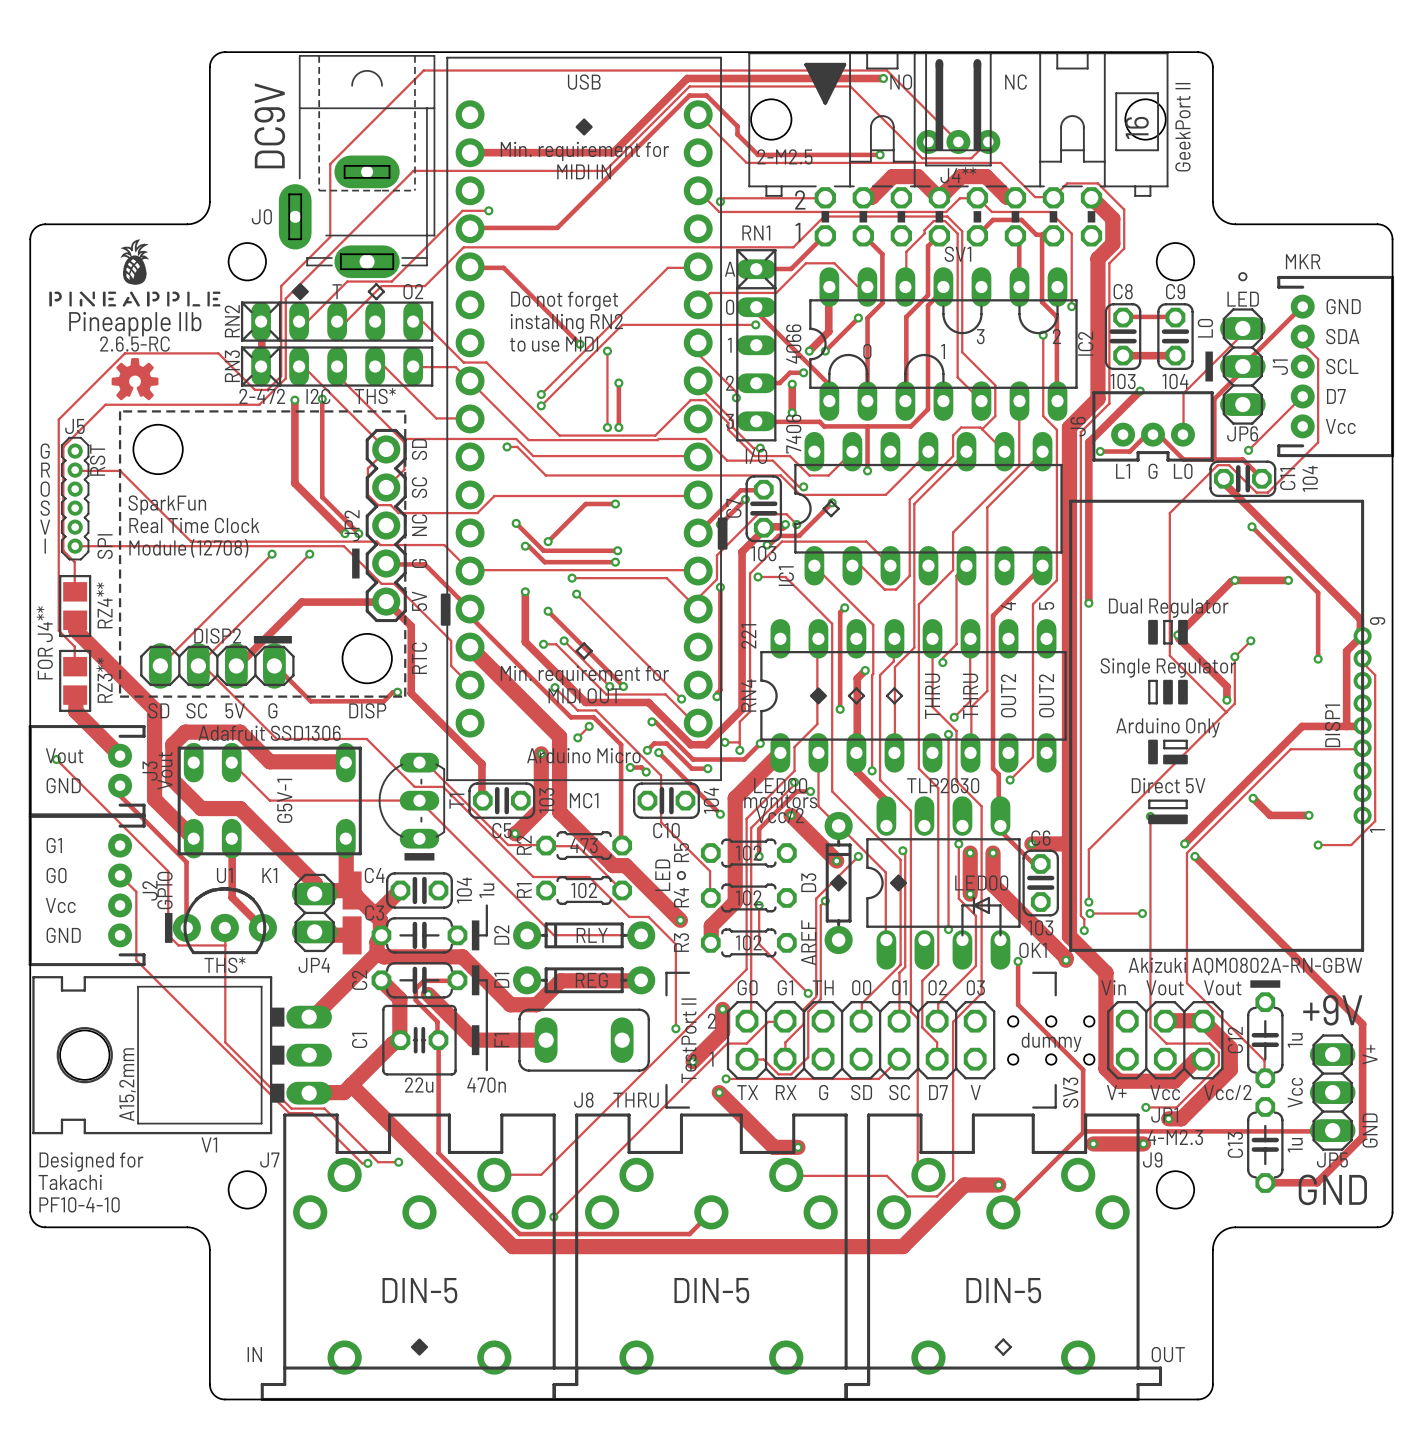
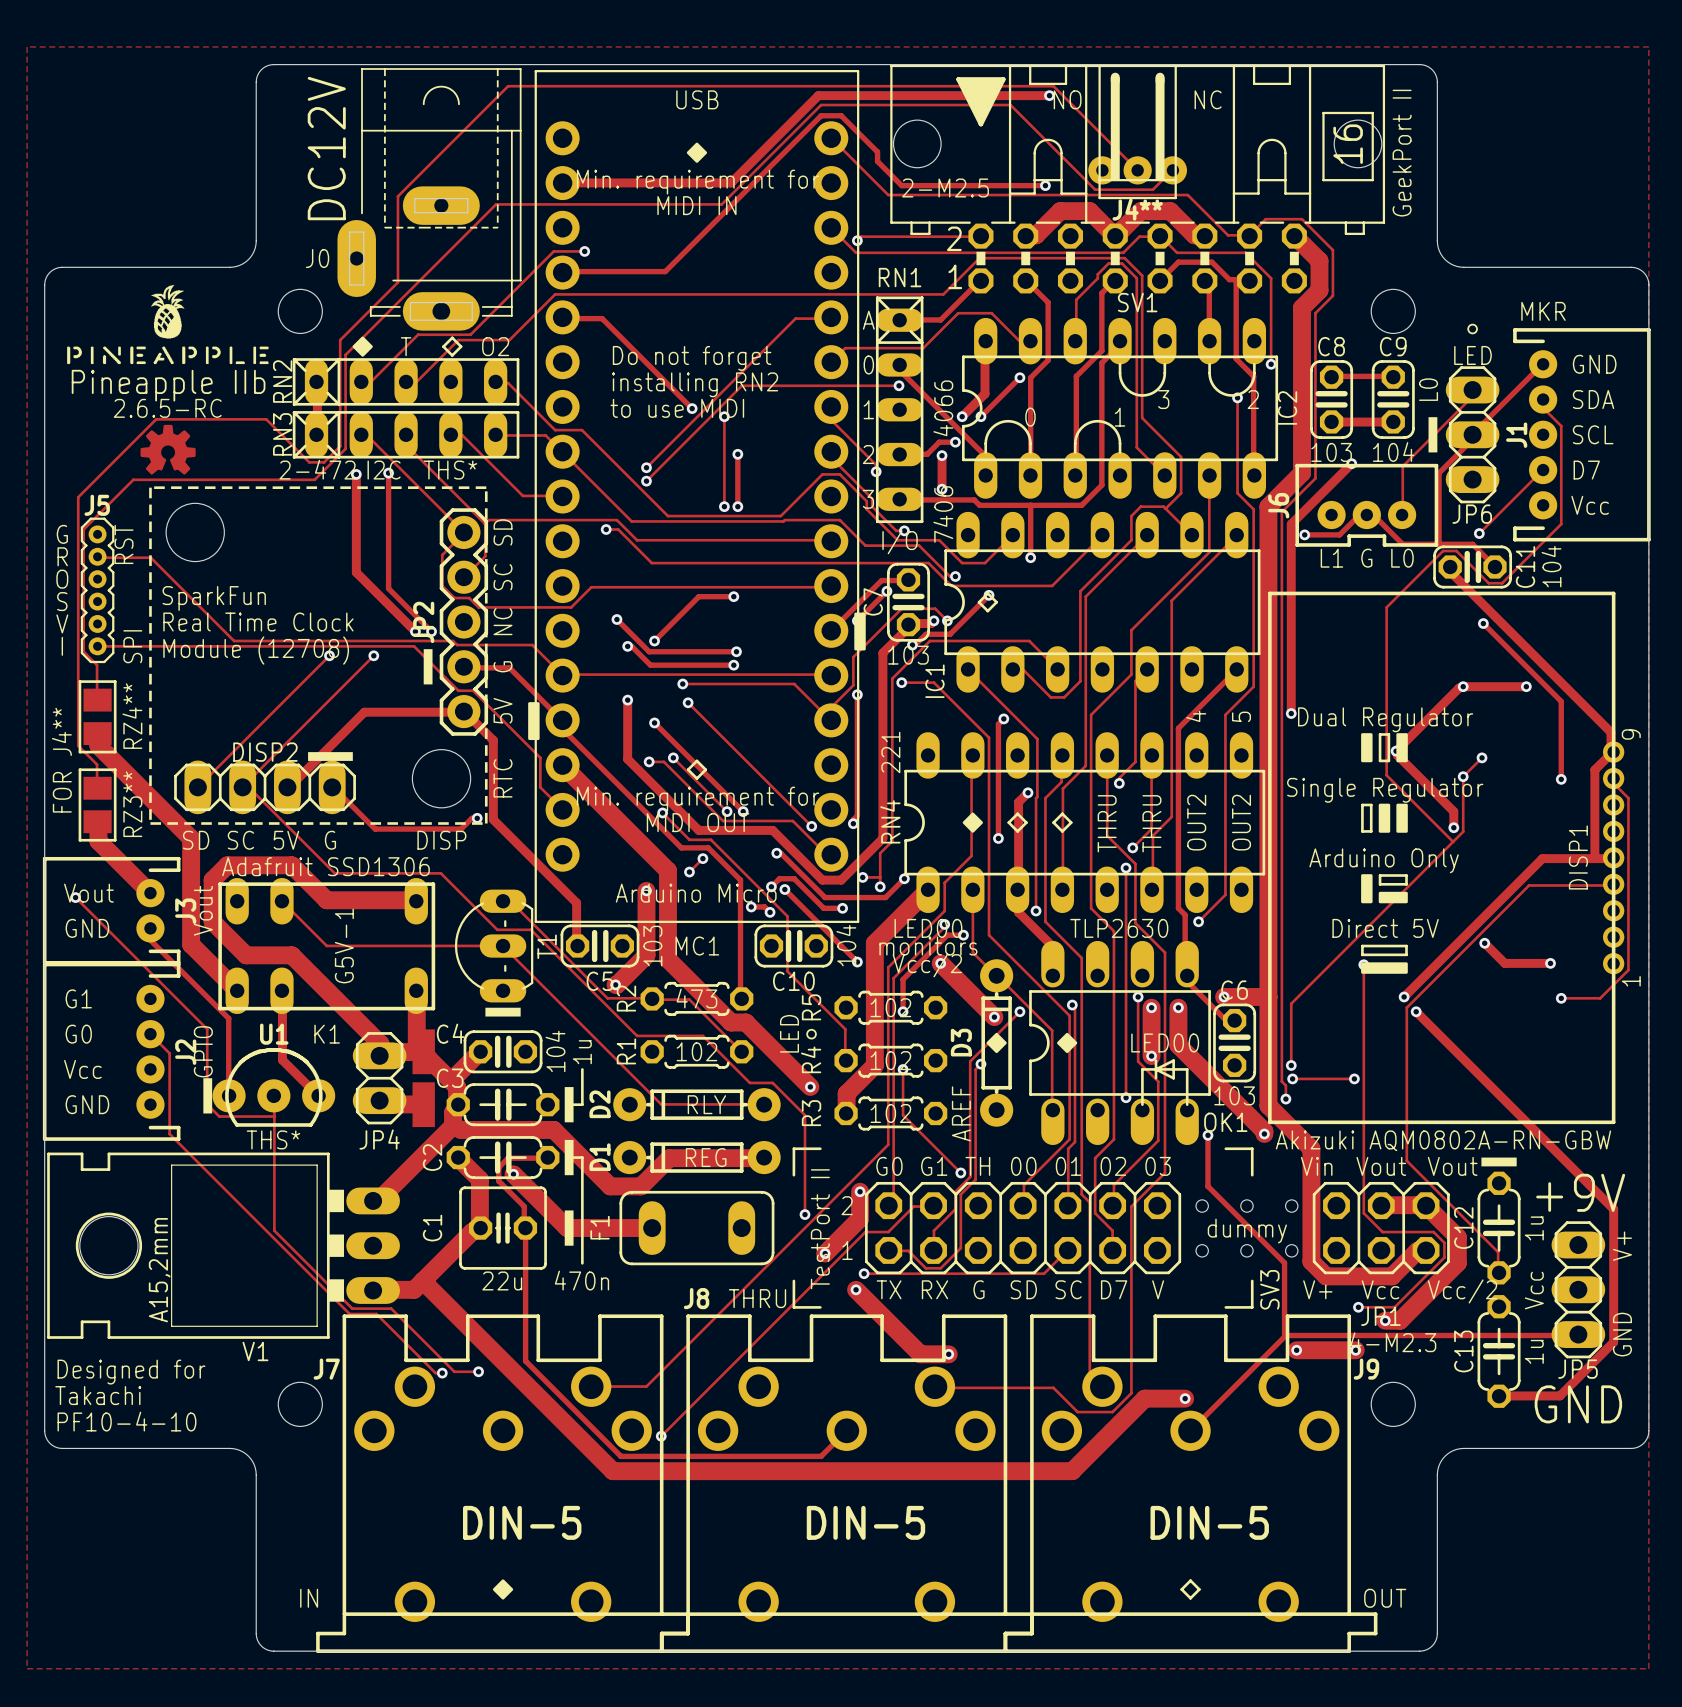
zone outline: none -> (27, 46) (1648, 46) (1648, 1668) (27, 1668) (27, 46)
text: DC9V (269, 125) -> DC12V (326, 148)

